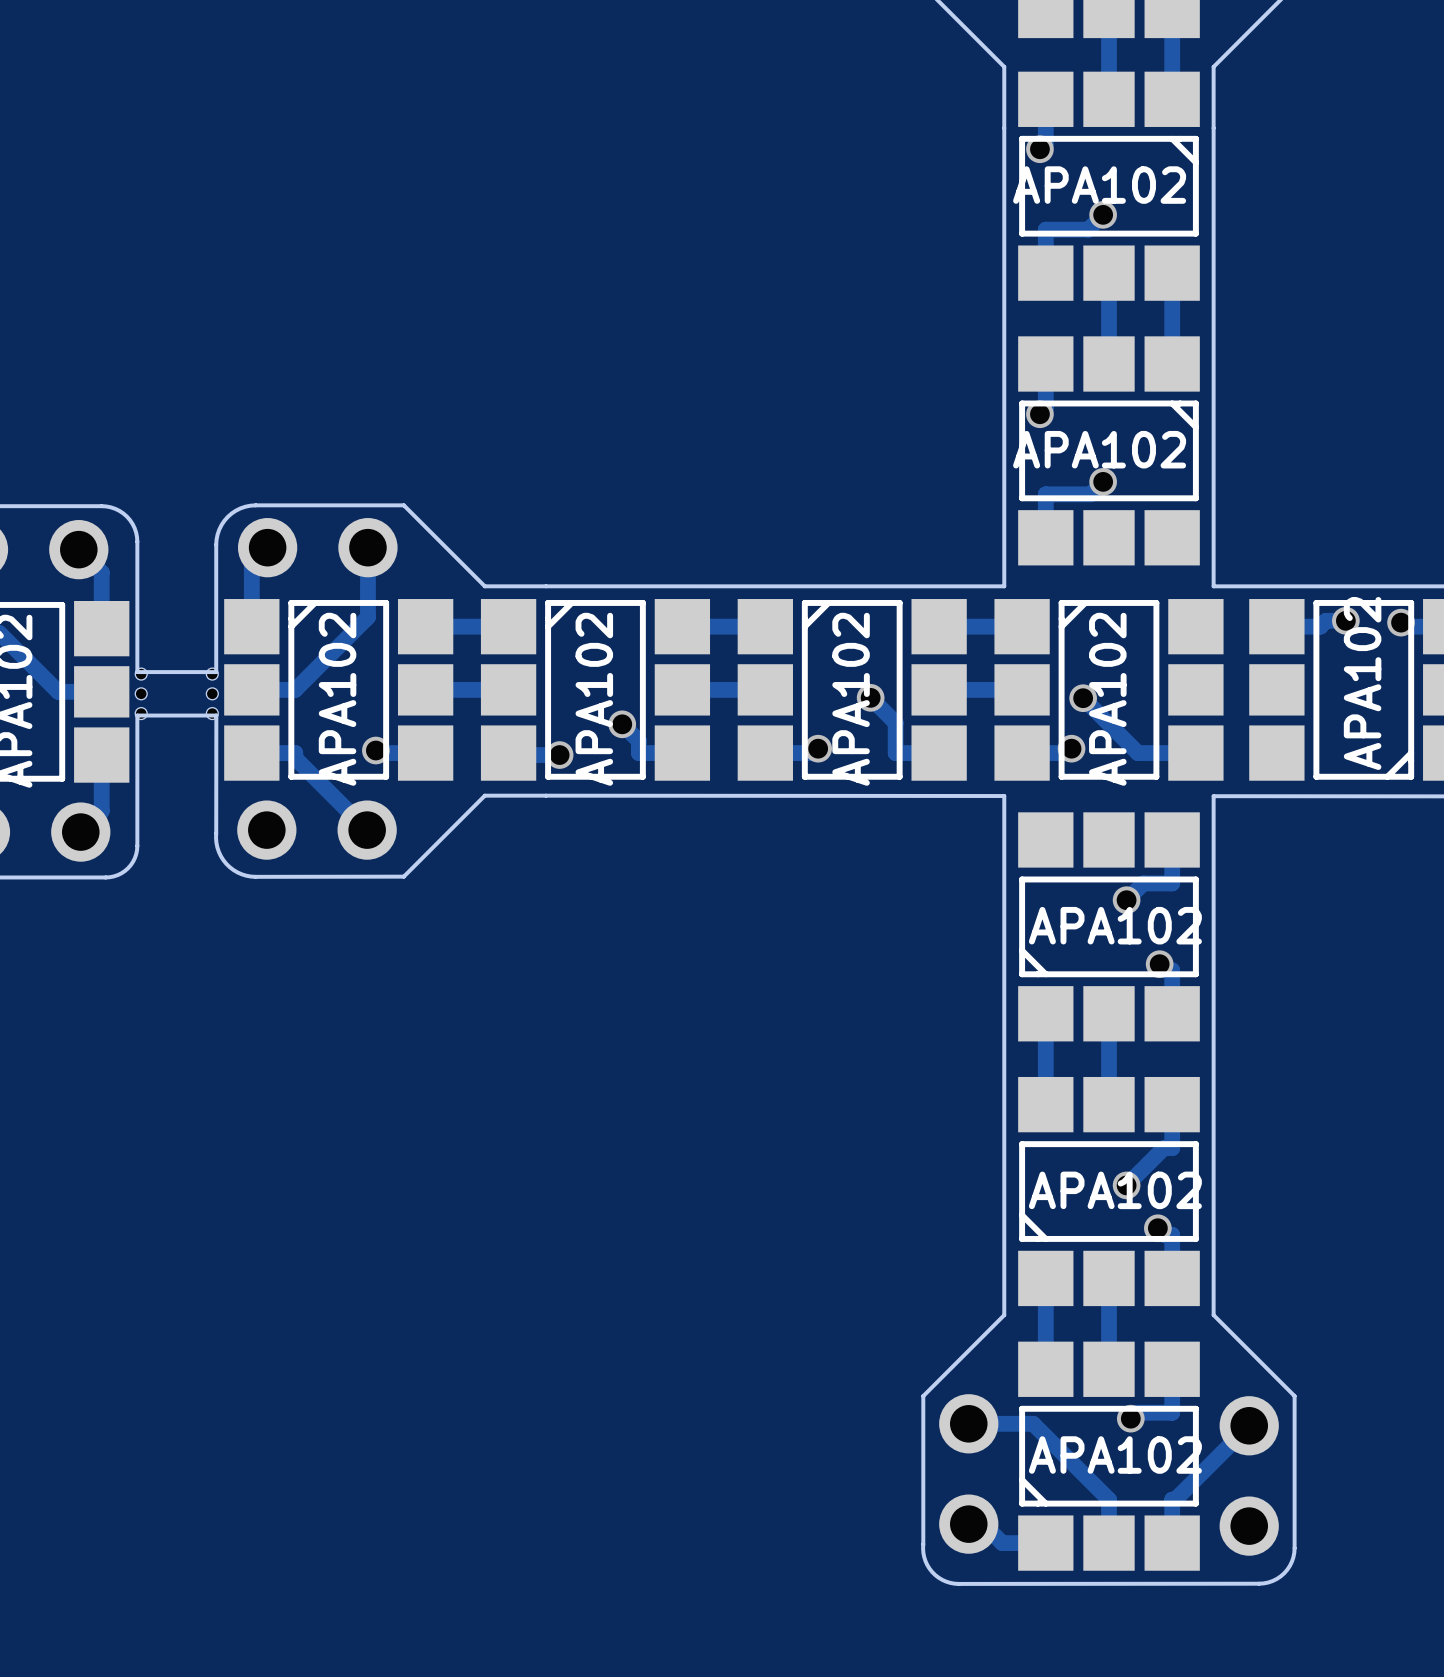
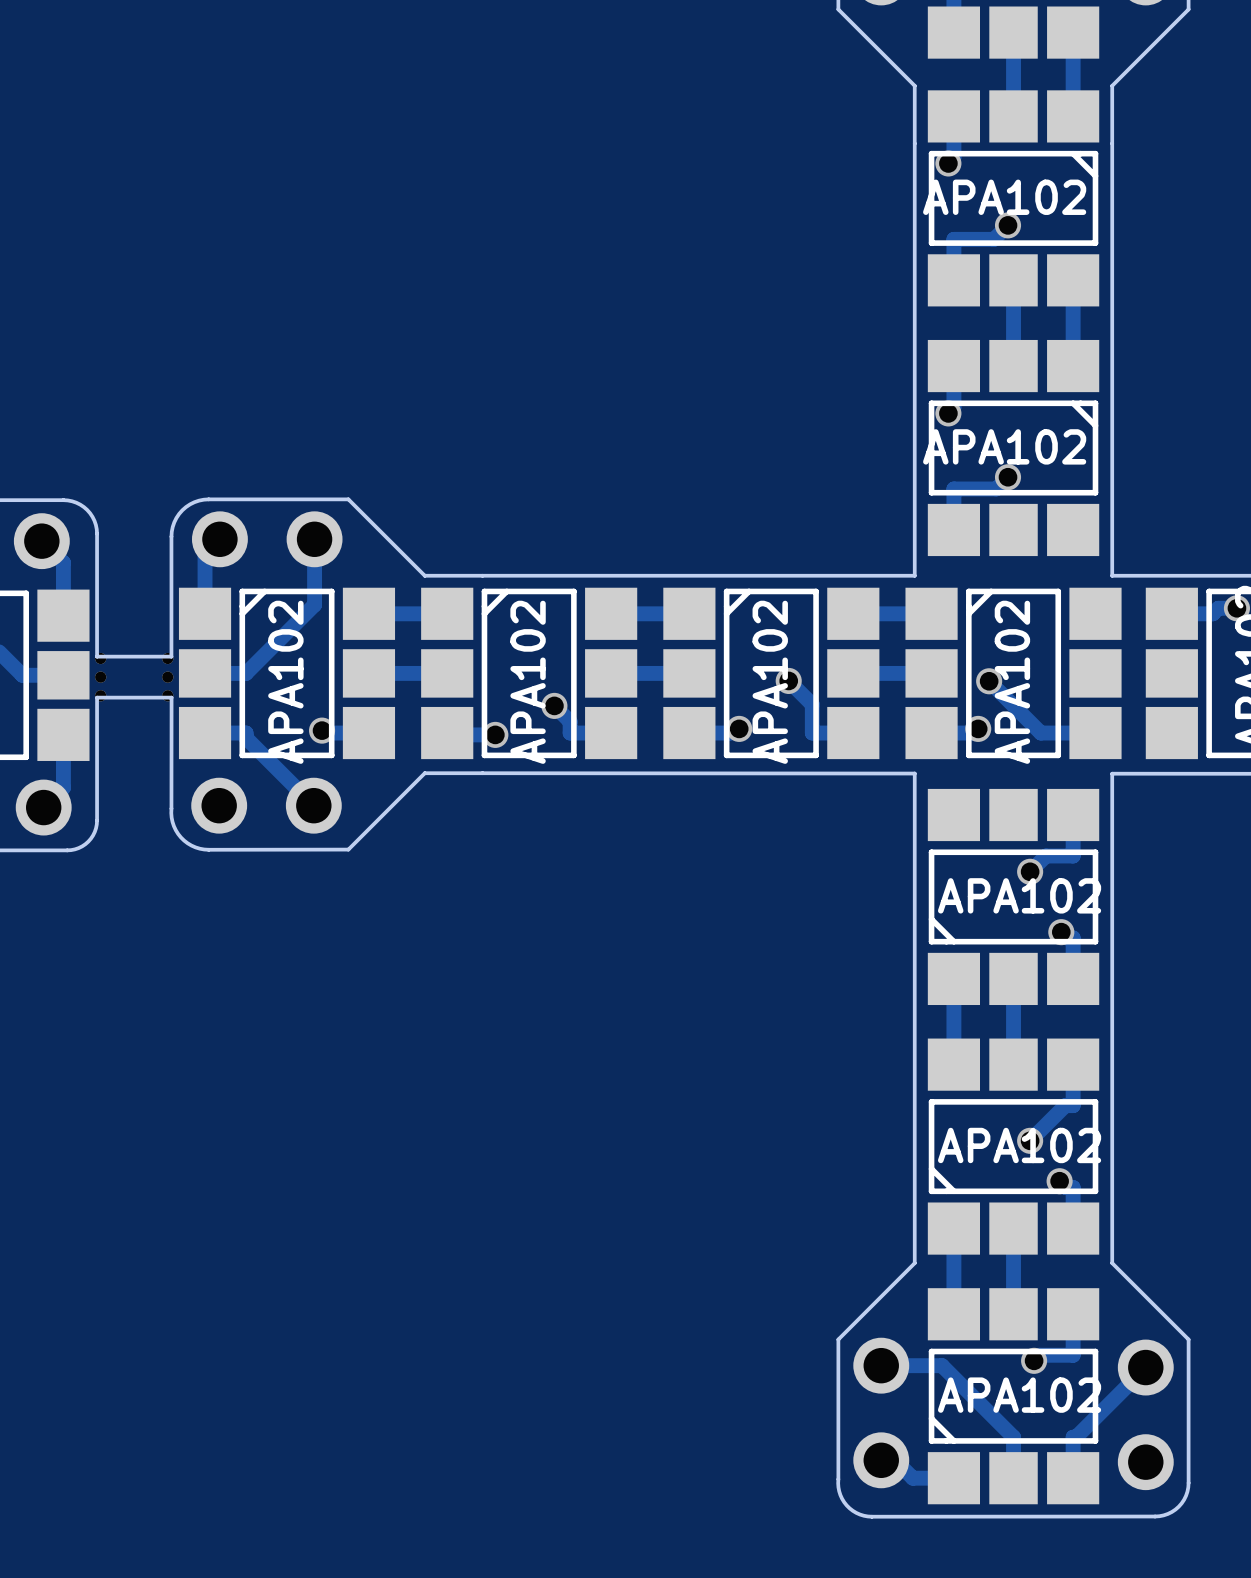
part footprint: [135, 668, 148, 680] -> [95, 652, 107, 665]
part footprint: [206, 668, 219, 680] -> [162, 652, 174, 665]
part footprint: [135, 687, 148, 700] -> [95, 671, 107, 683]
part footprint: [206, 687, 219, 700] -> [162, 671, 174, 683]
part footprint: [135, 707, 148, 720] -> [95, 690, 107, 702]
part footprint: [206, 707, 219, 720] -> [162, 690, 174, 702]

